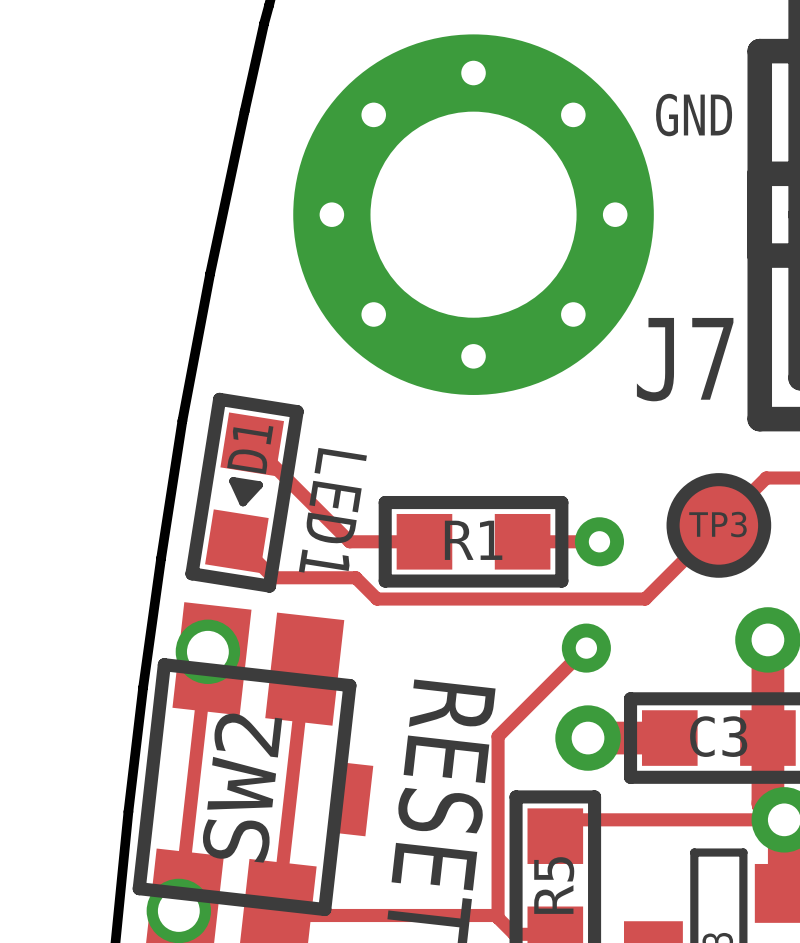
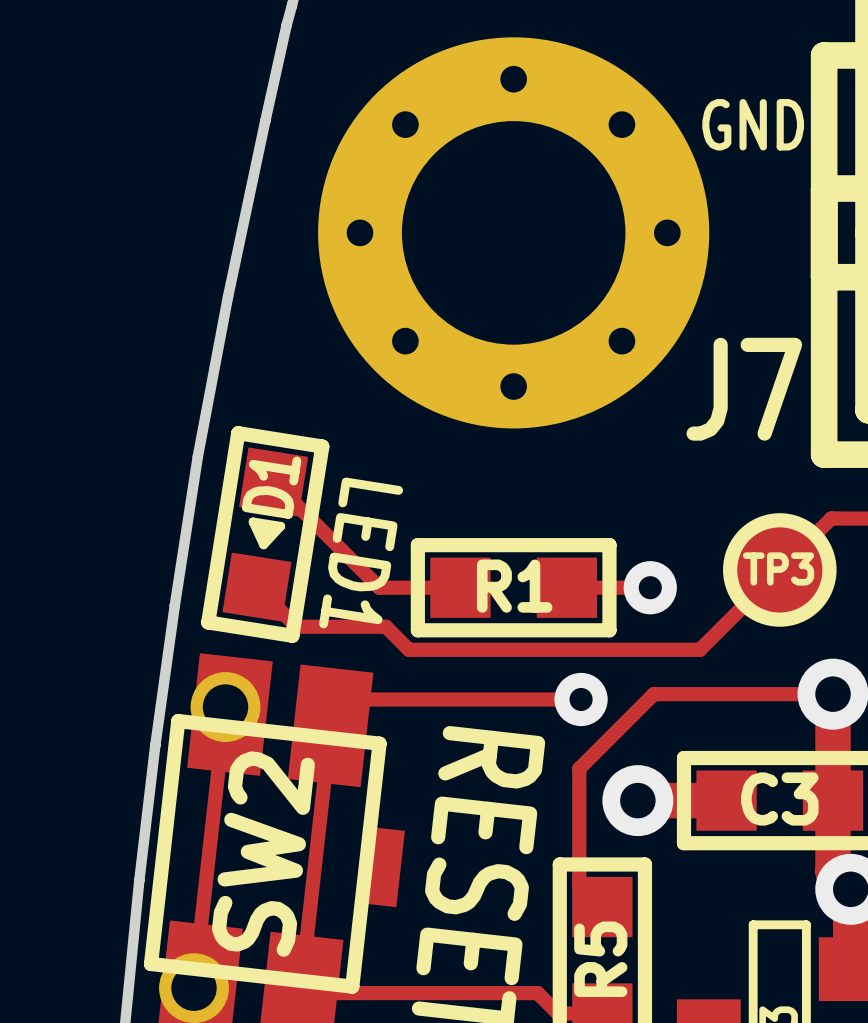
track: none -> (581, 699) (356, 699) (330, 725)
track: (586, 648) (498, 736) (498, 917) -> none
via position: (586, 648) -> (581, 699)
track: (784, 819) (571, 819) (555, 836) -> (833, 694) (653, 694) (579, 768) (579, 883) (602, 907)

